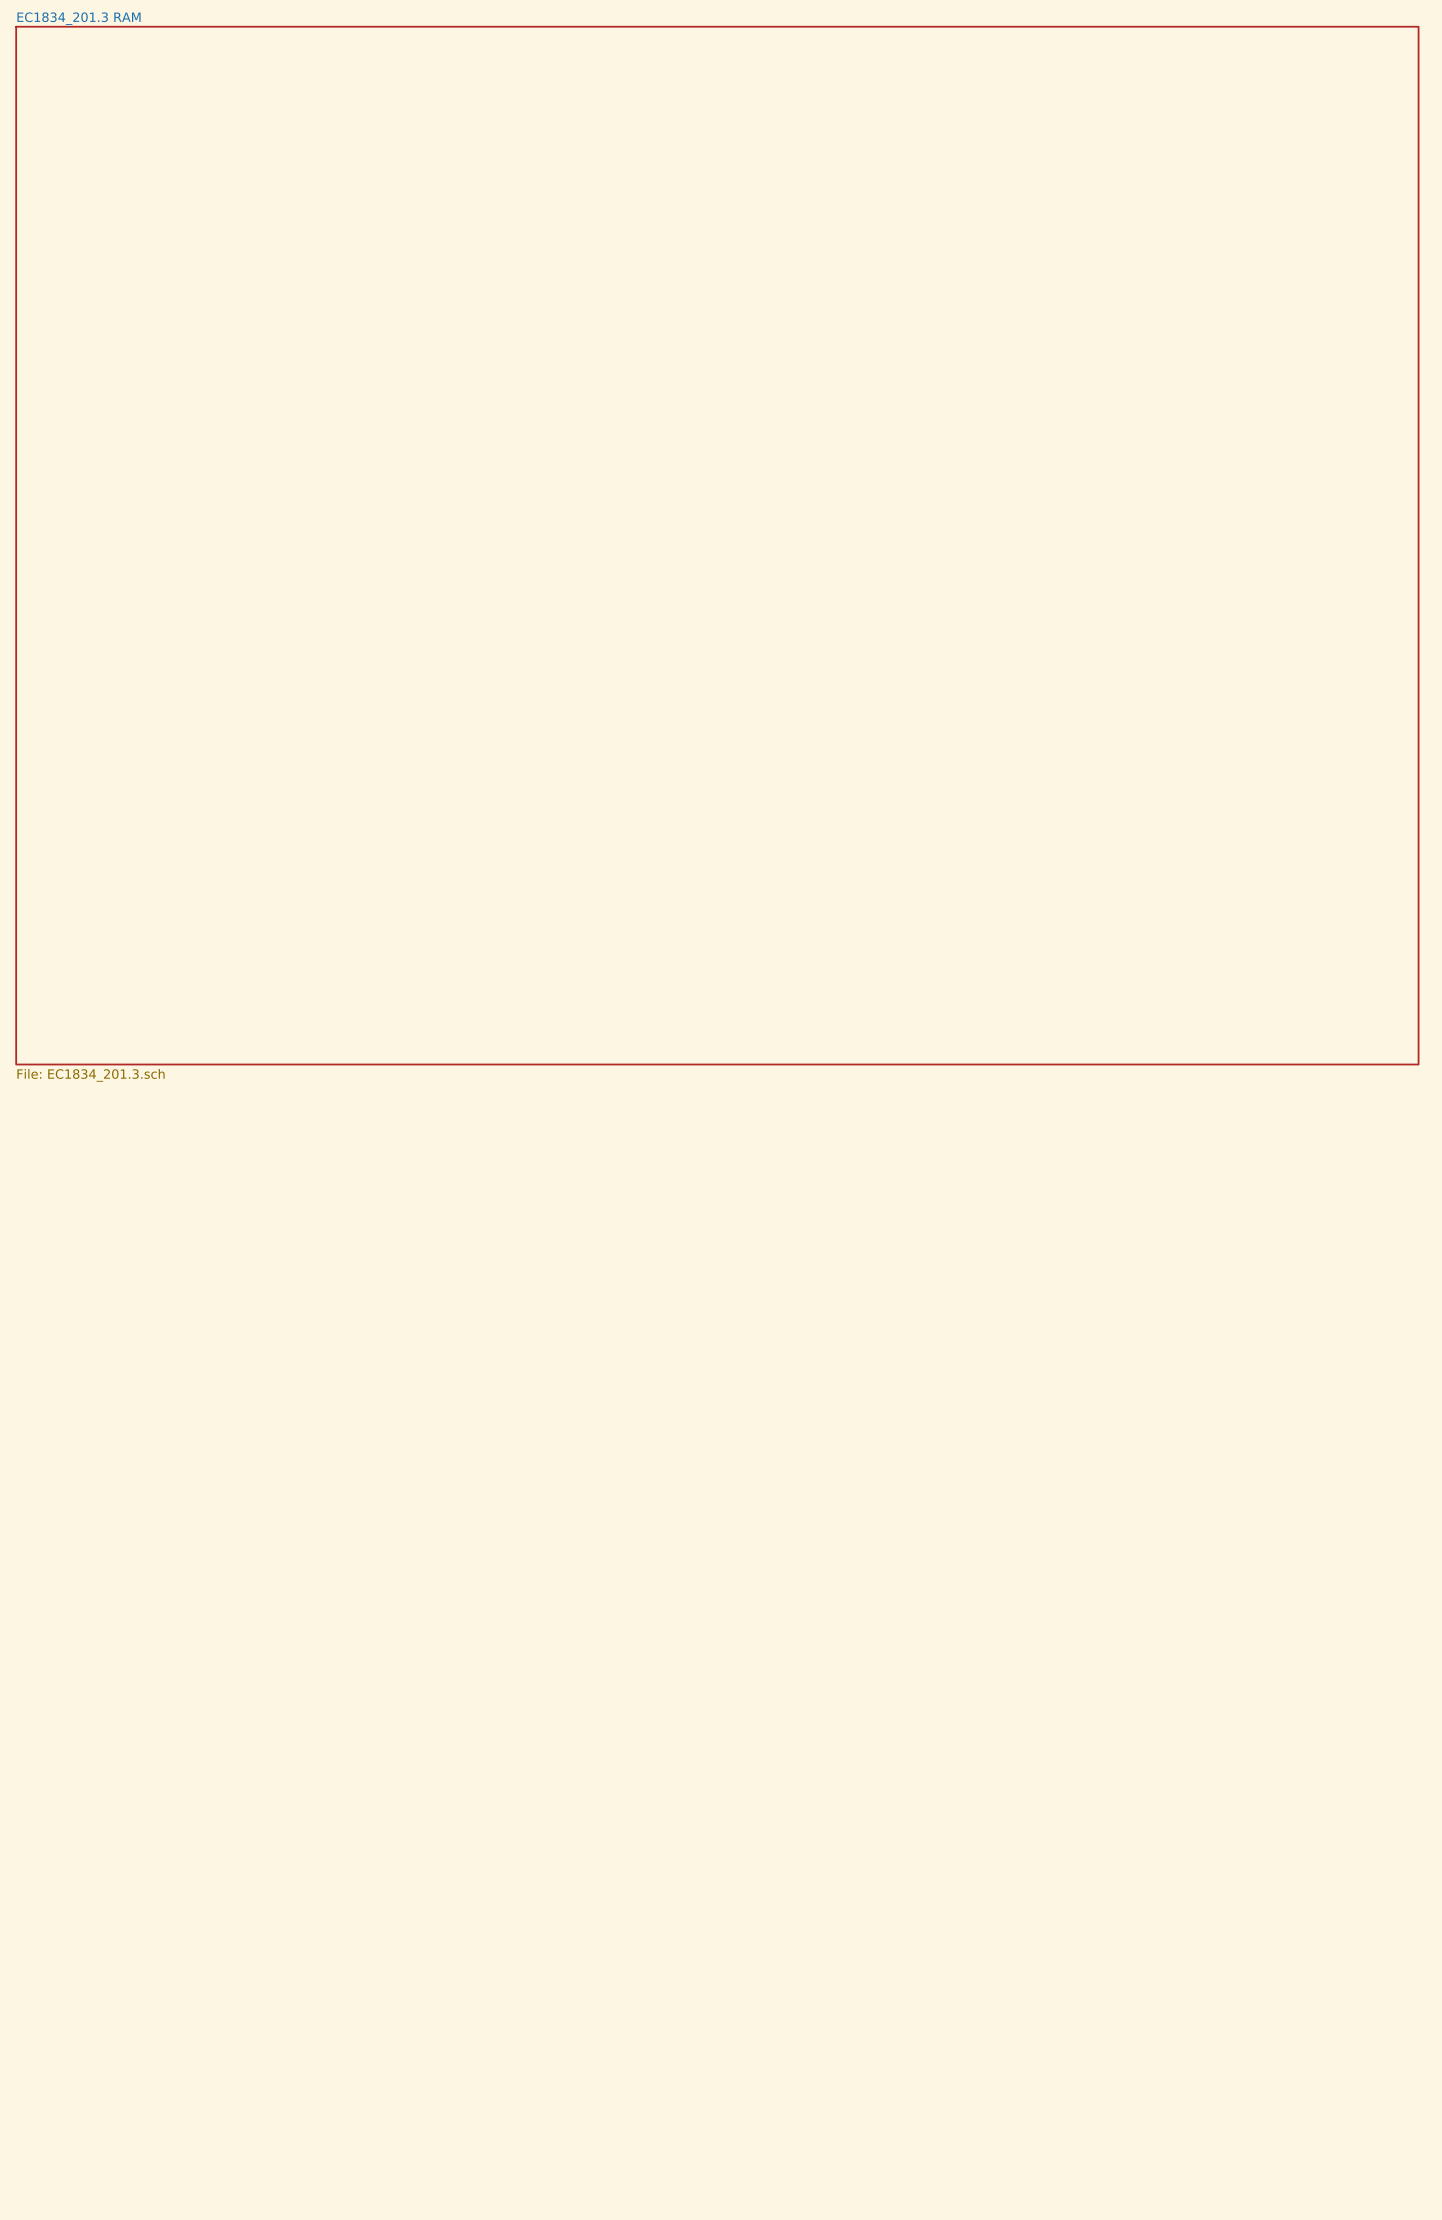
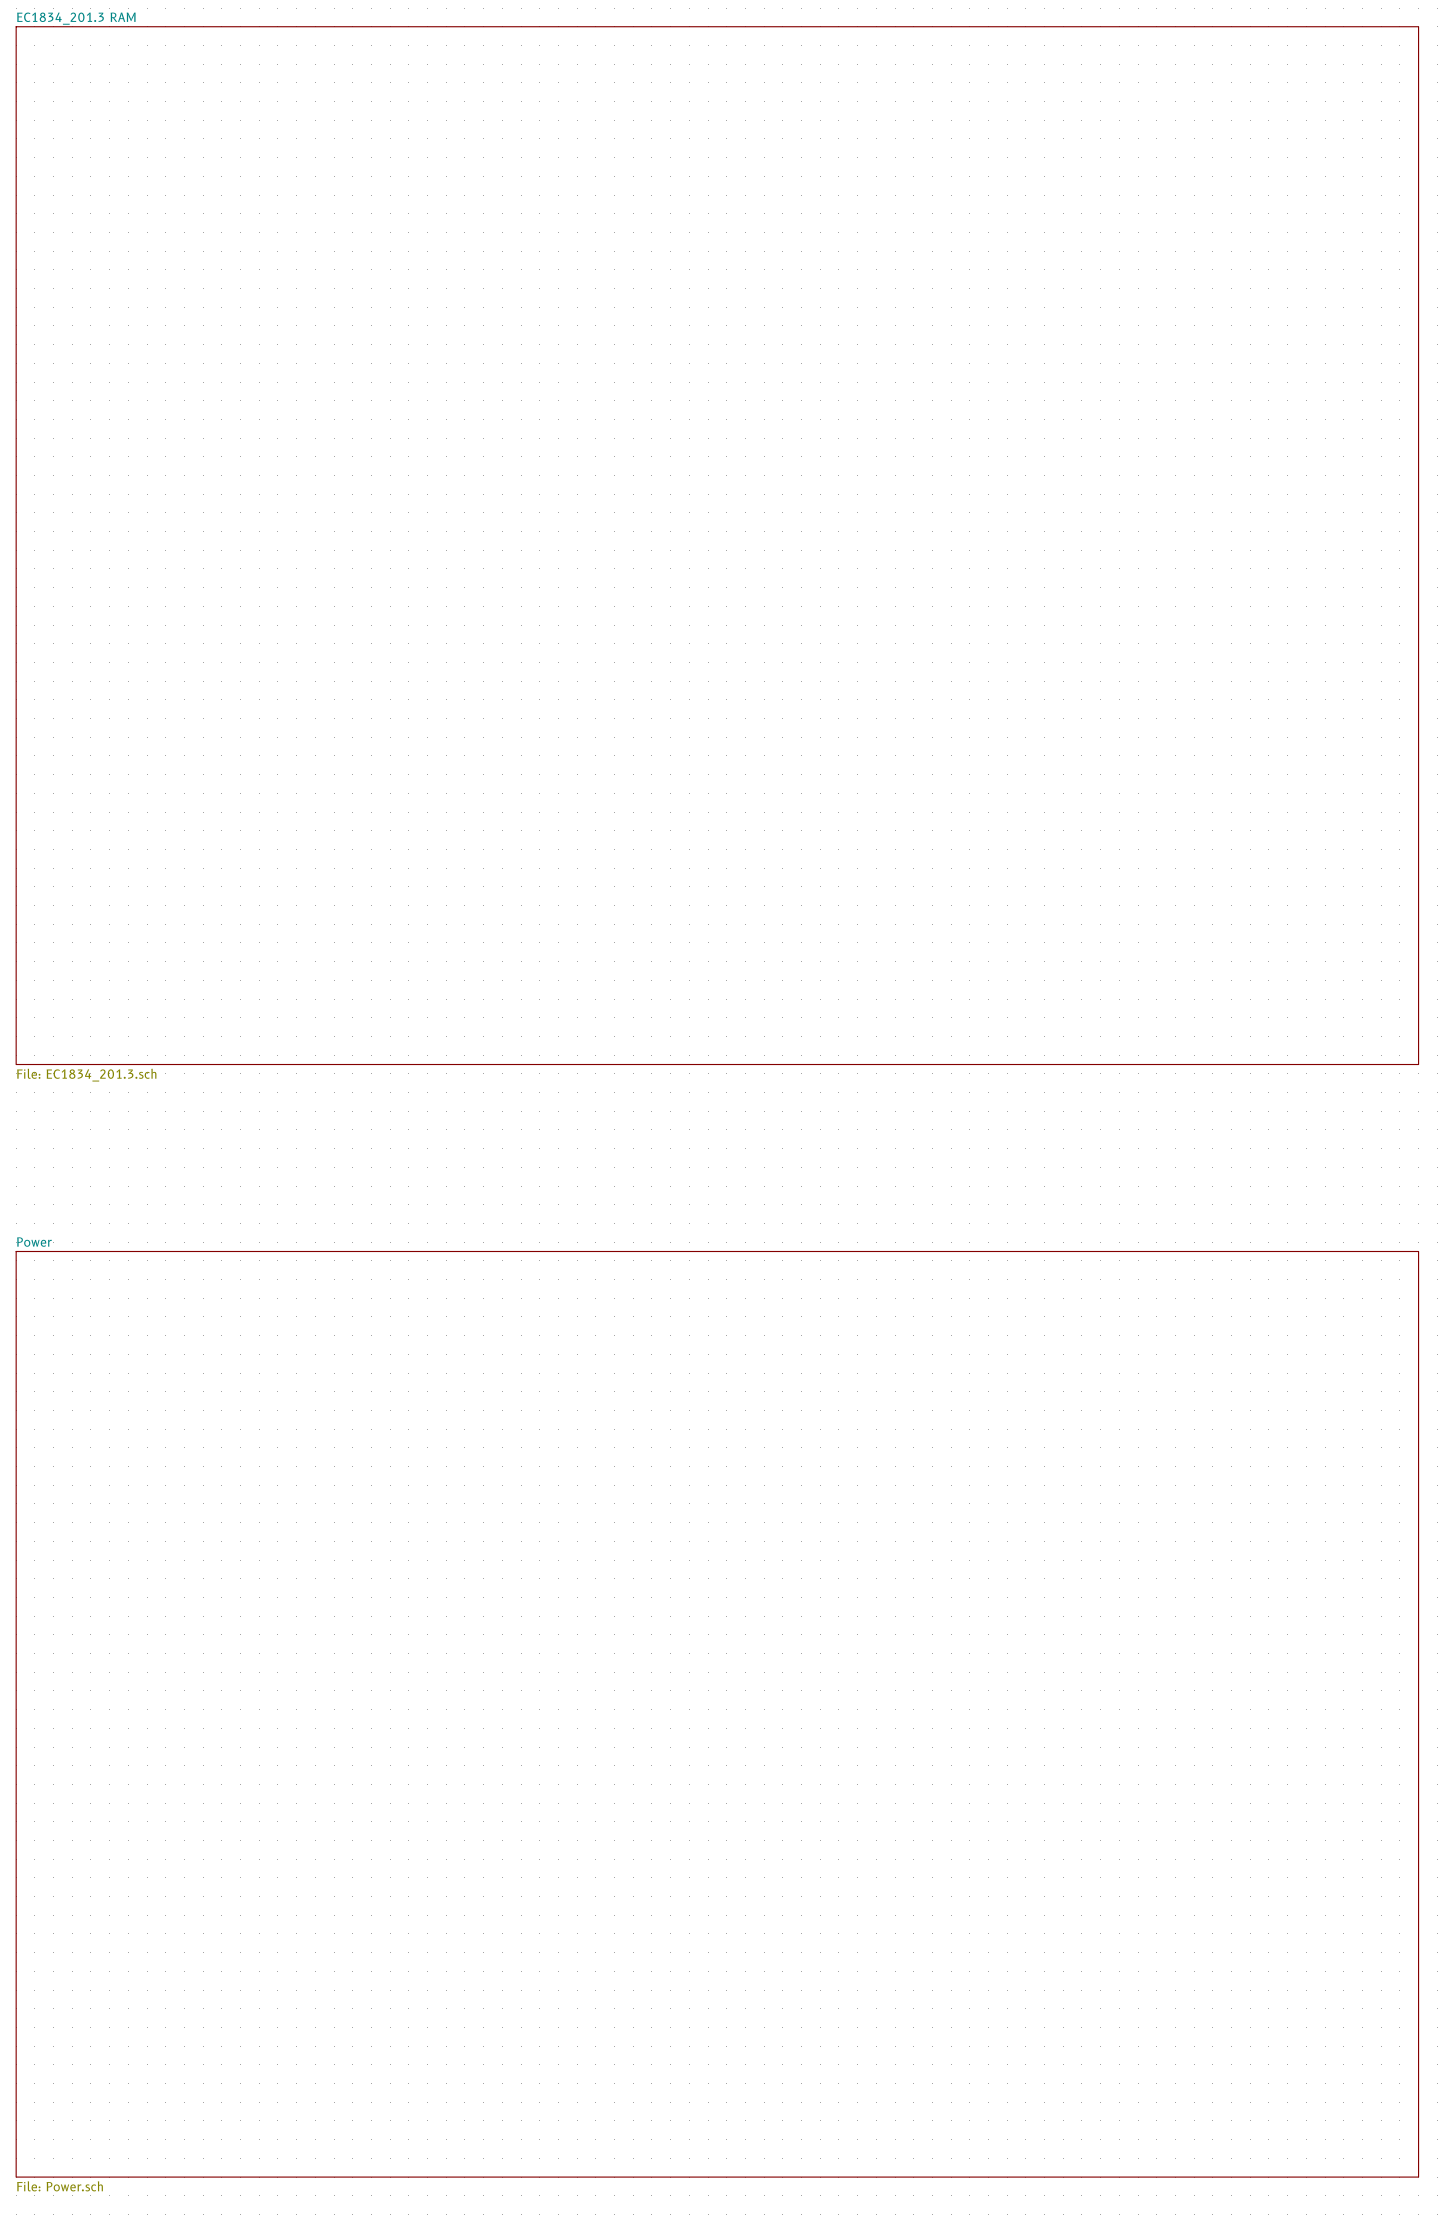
sheet Power: none -> File: Power.sch (717, 1714)

